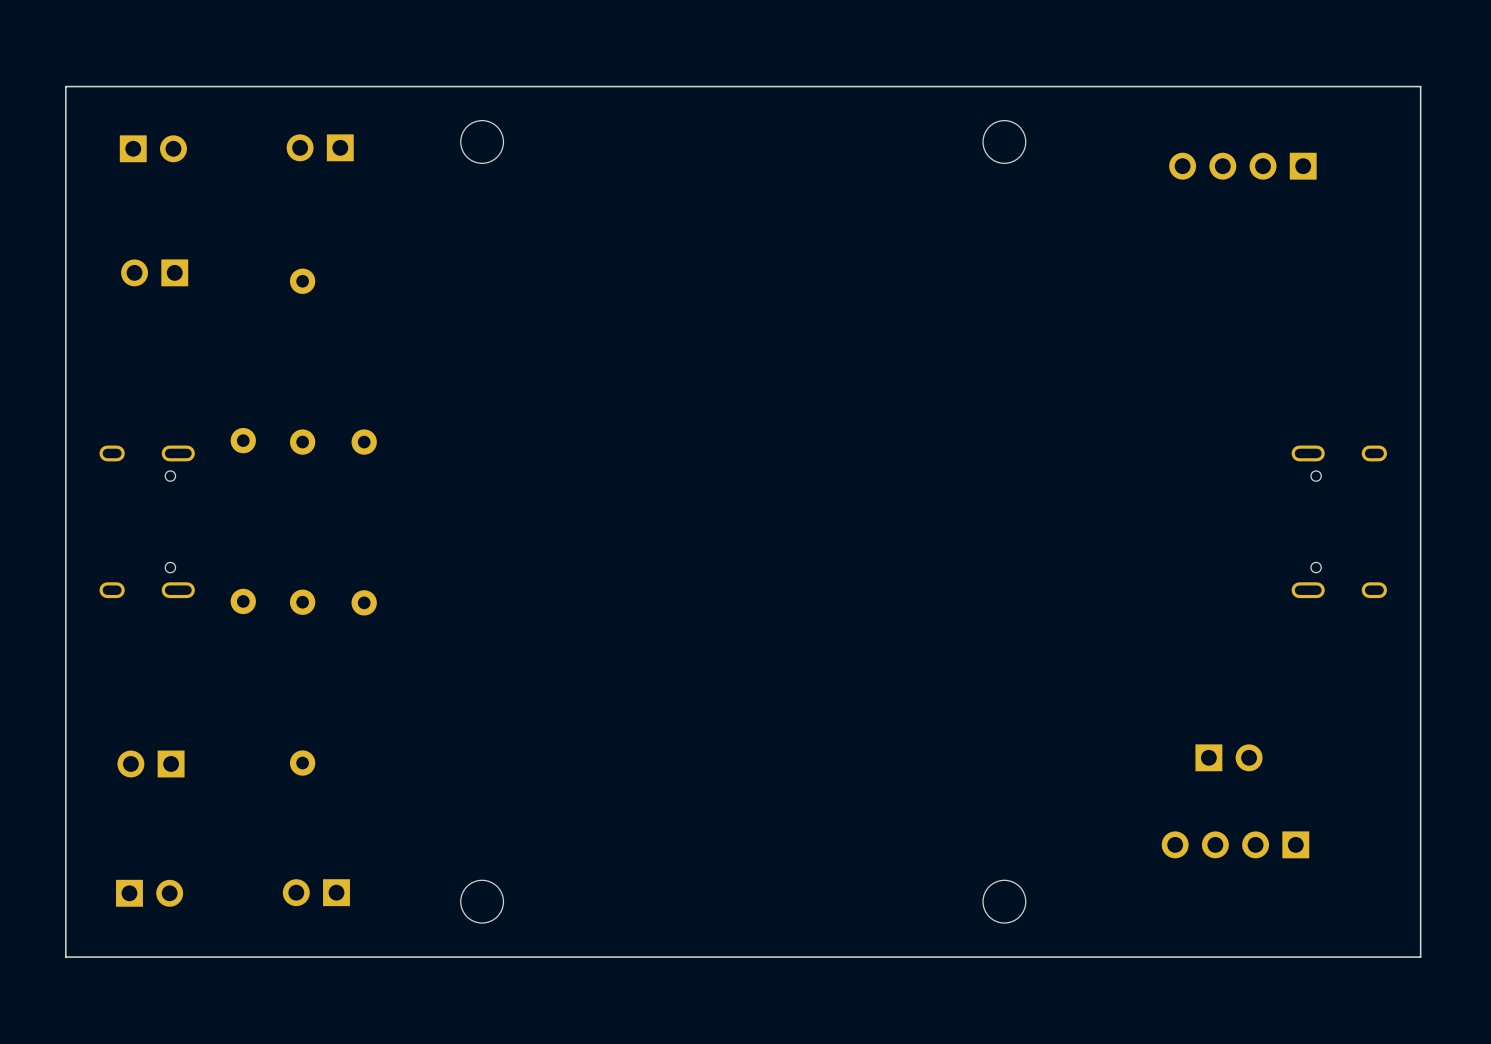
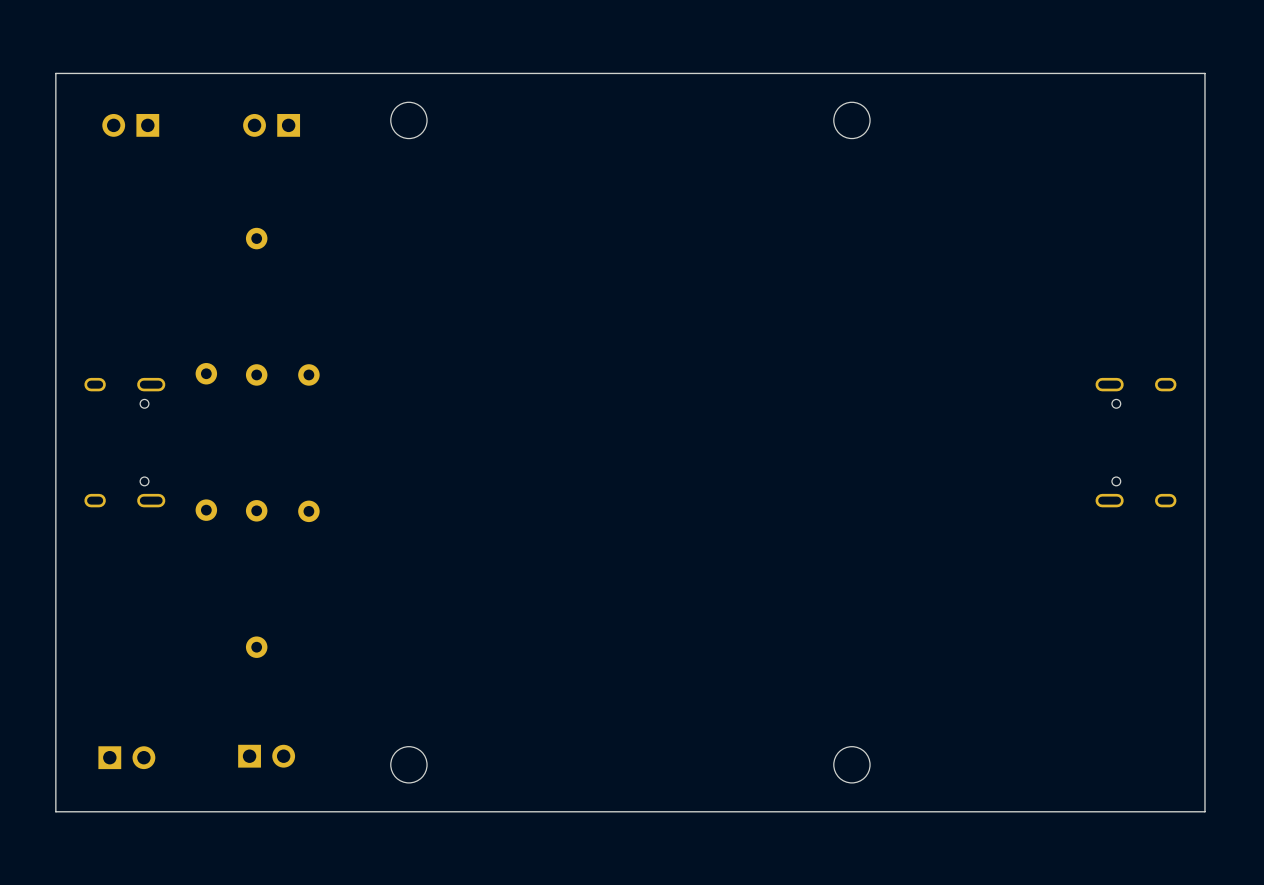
part rotation: 0° (153, 148) -> 180° (130, 125)
part: (1242, 166) -> none
part: (154, 272) -> none
part: (1228, 757) -> none
part: (151, 763) -> none
part: (1235, 844) -> none
part rotation: 0° (316, 892) -> 180° (266, 756)

